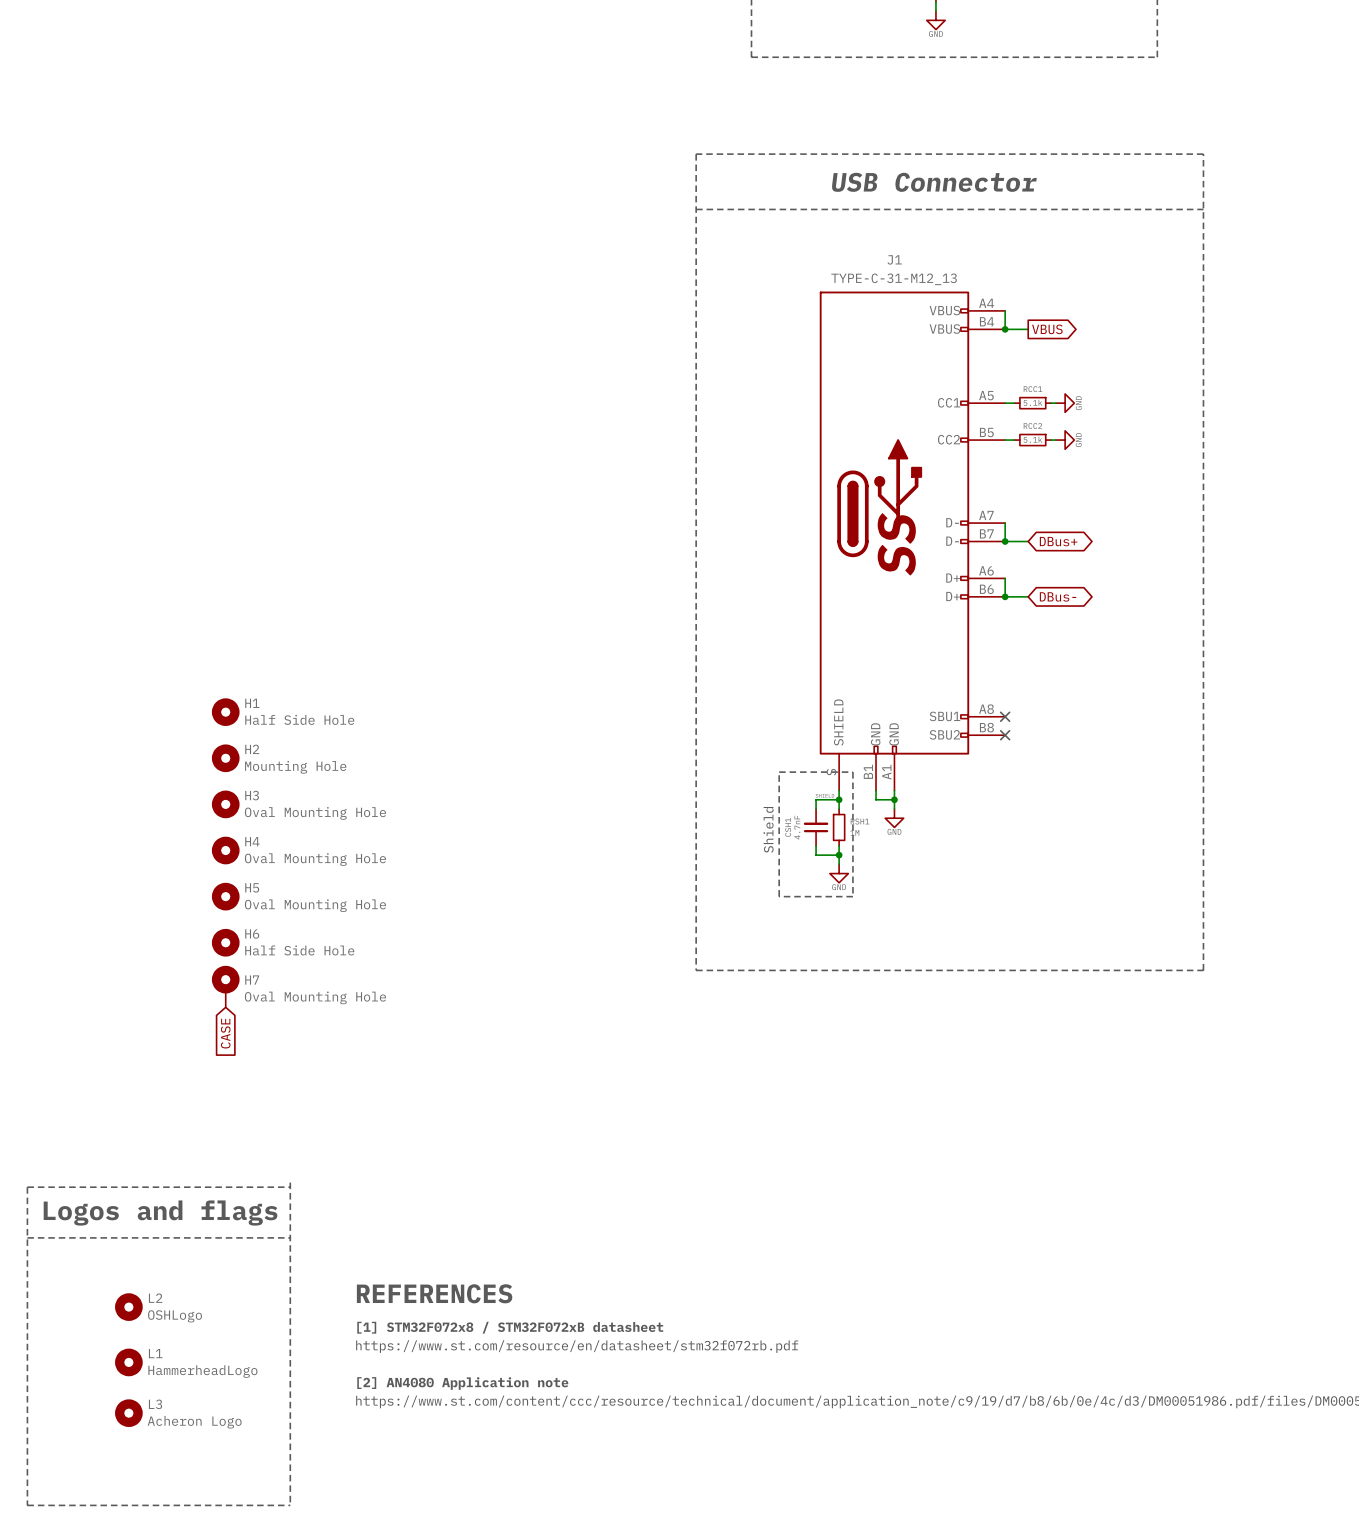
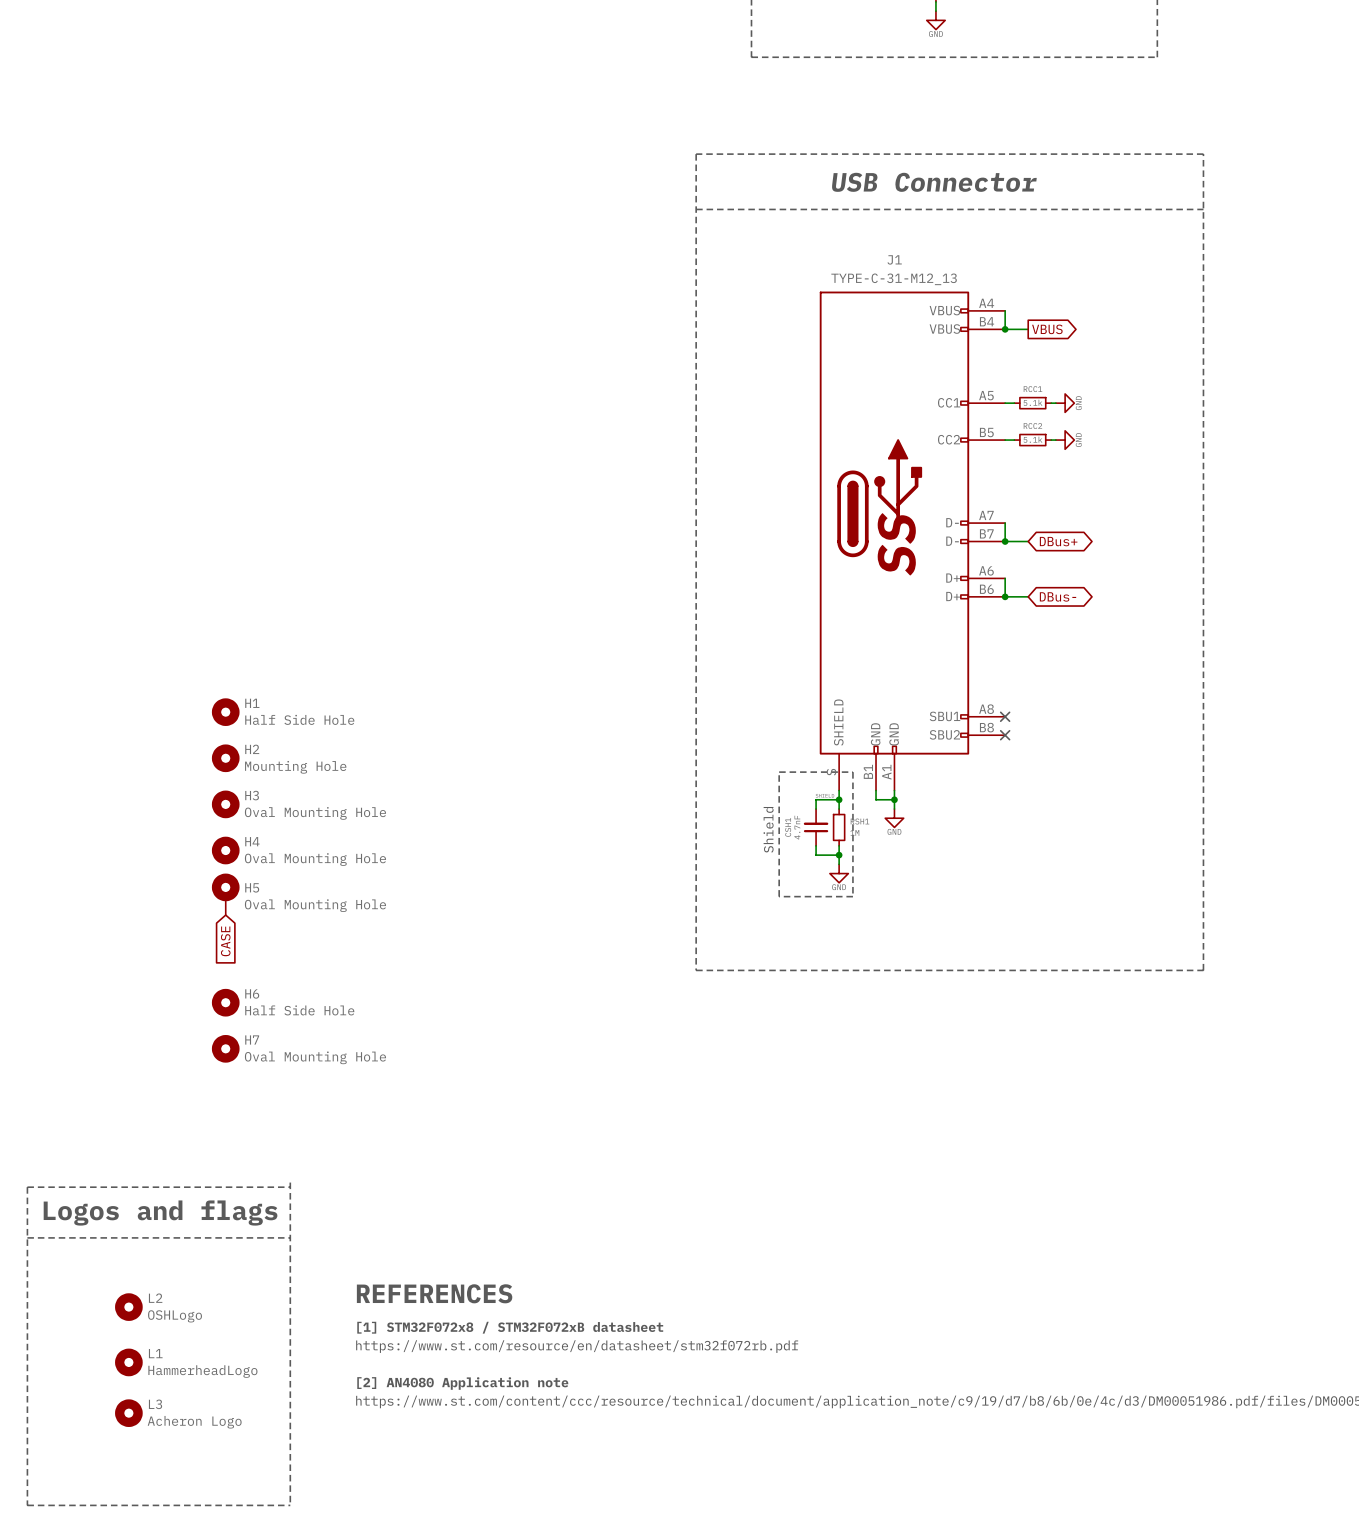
H5 symbol: [211, 882, 240, 911] -> [211, 873, 240, 916]
H6 position: (225, 942) -> (225, 1002)
H7 symbol: [211, 965, 240, 1008] -> [211, 1034, 240, 1063]
global label position: CASE (225, 1033) -> CASE (225, 941)

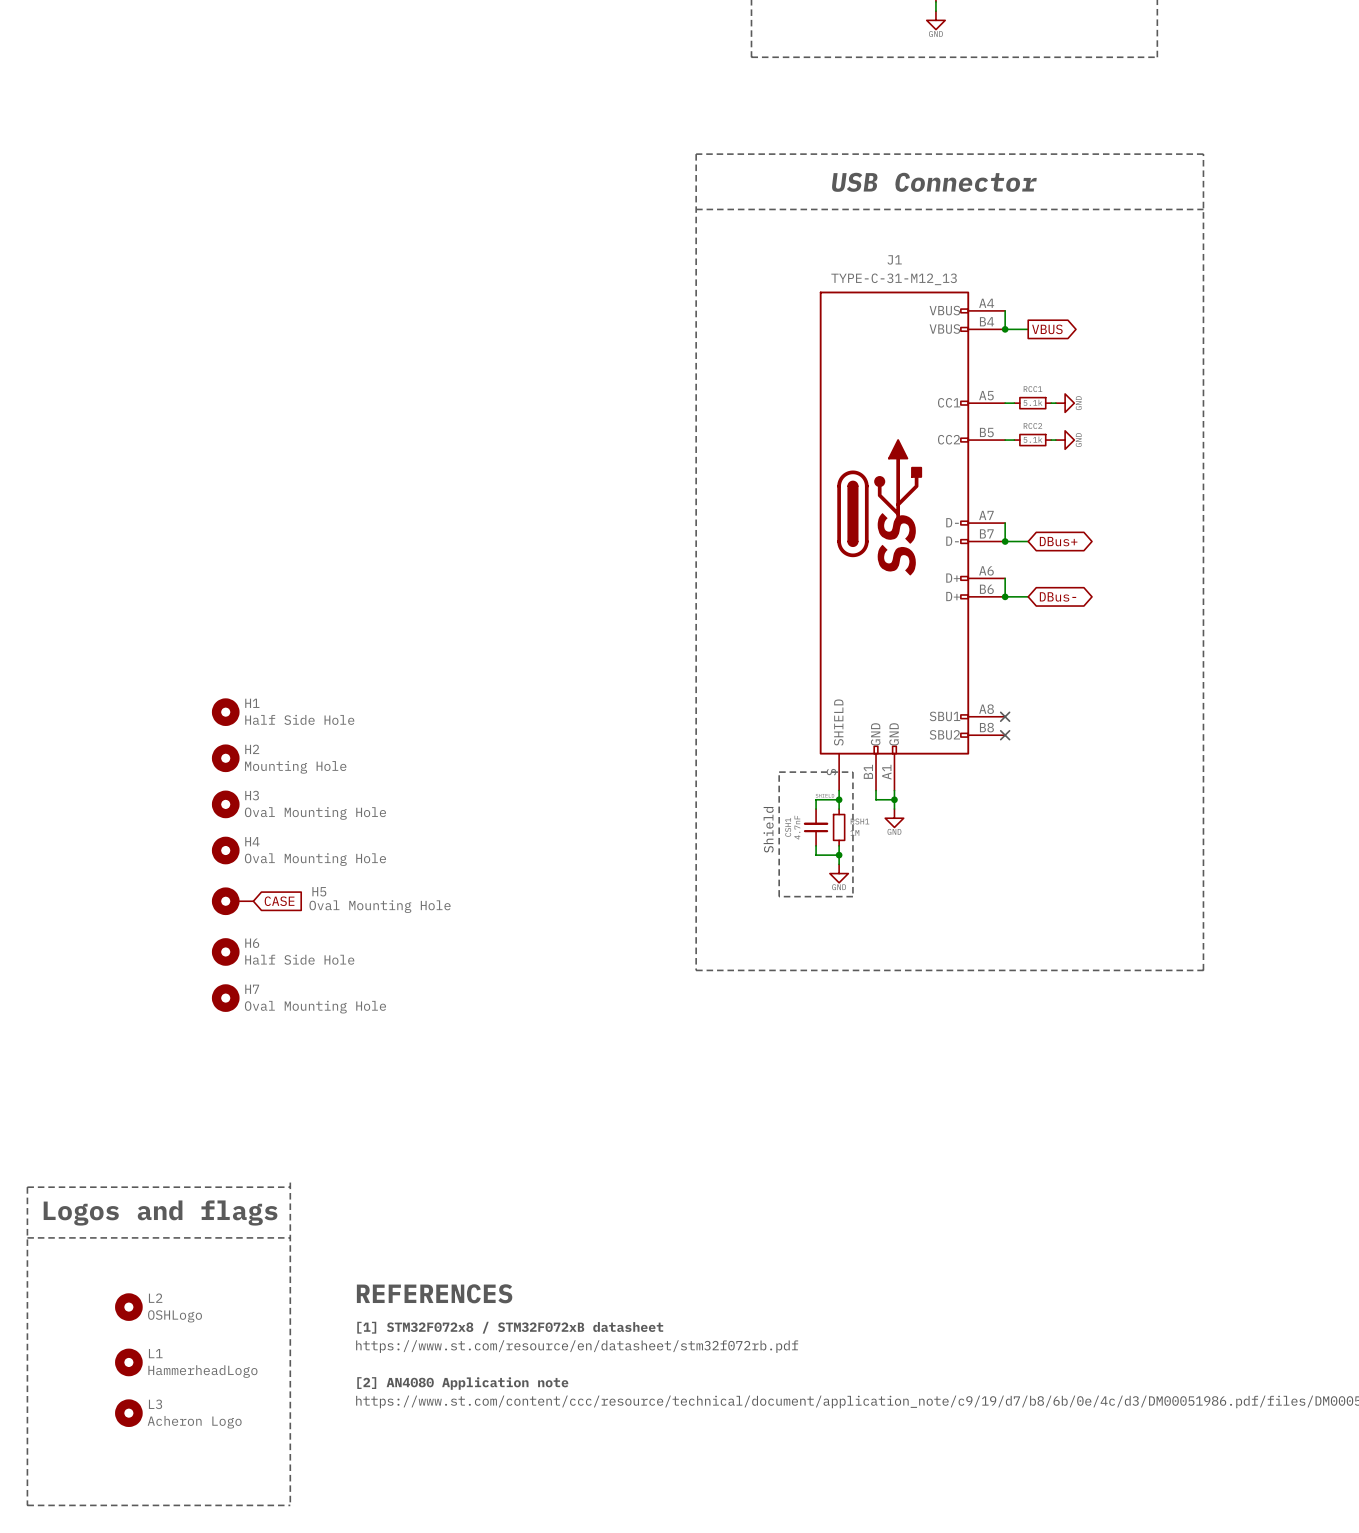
H5 rotation: 0° (225, 887) -> 90° counterclockwise (225, 901)
H5 name position: H5 (252, 887) -> H5 (319, 891)
H5 value position: Oval Mounting Hole (315, 905) -> Oval Mounting Hole (380, 906)
global label rotation: 0° (225, 941) -> 90° counterclockwise (279, 901)
global label position: CASE (225, 941) -> CASE (279, 901)
H6 position: (225, 1002) -> (225, 951)
H7 position: (225, 1048) -> (225, 998)

